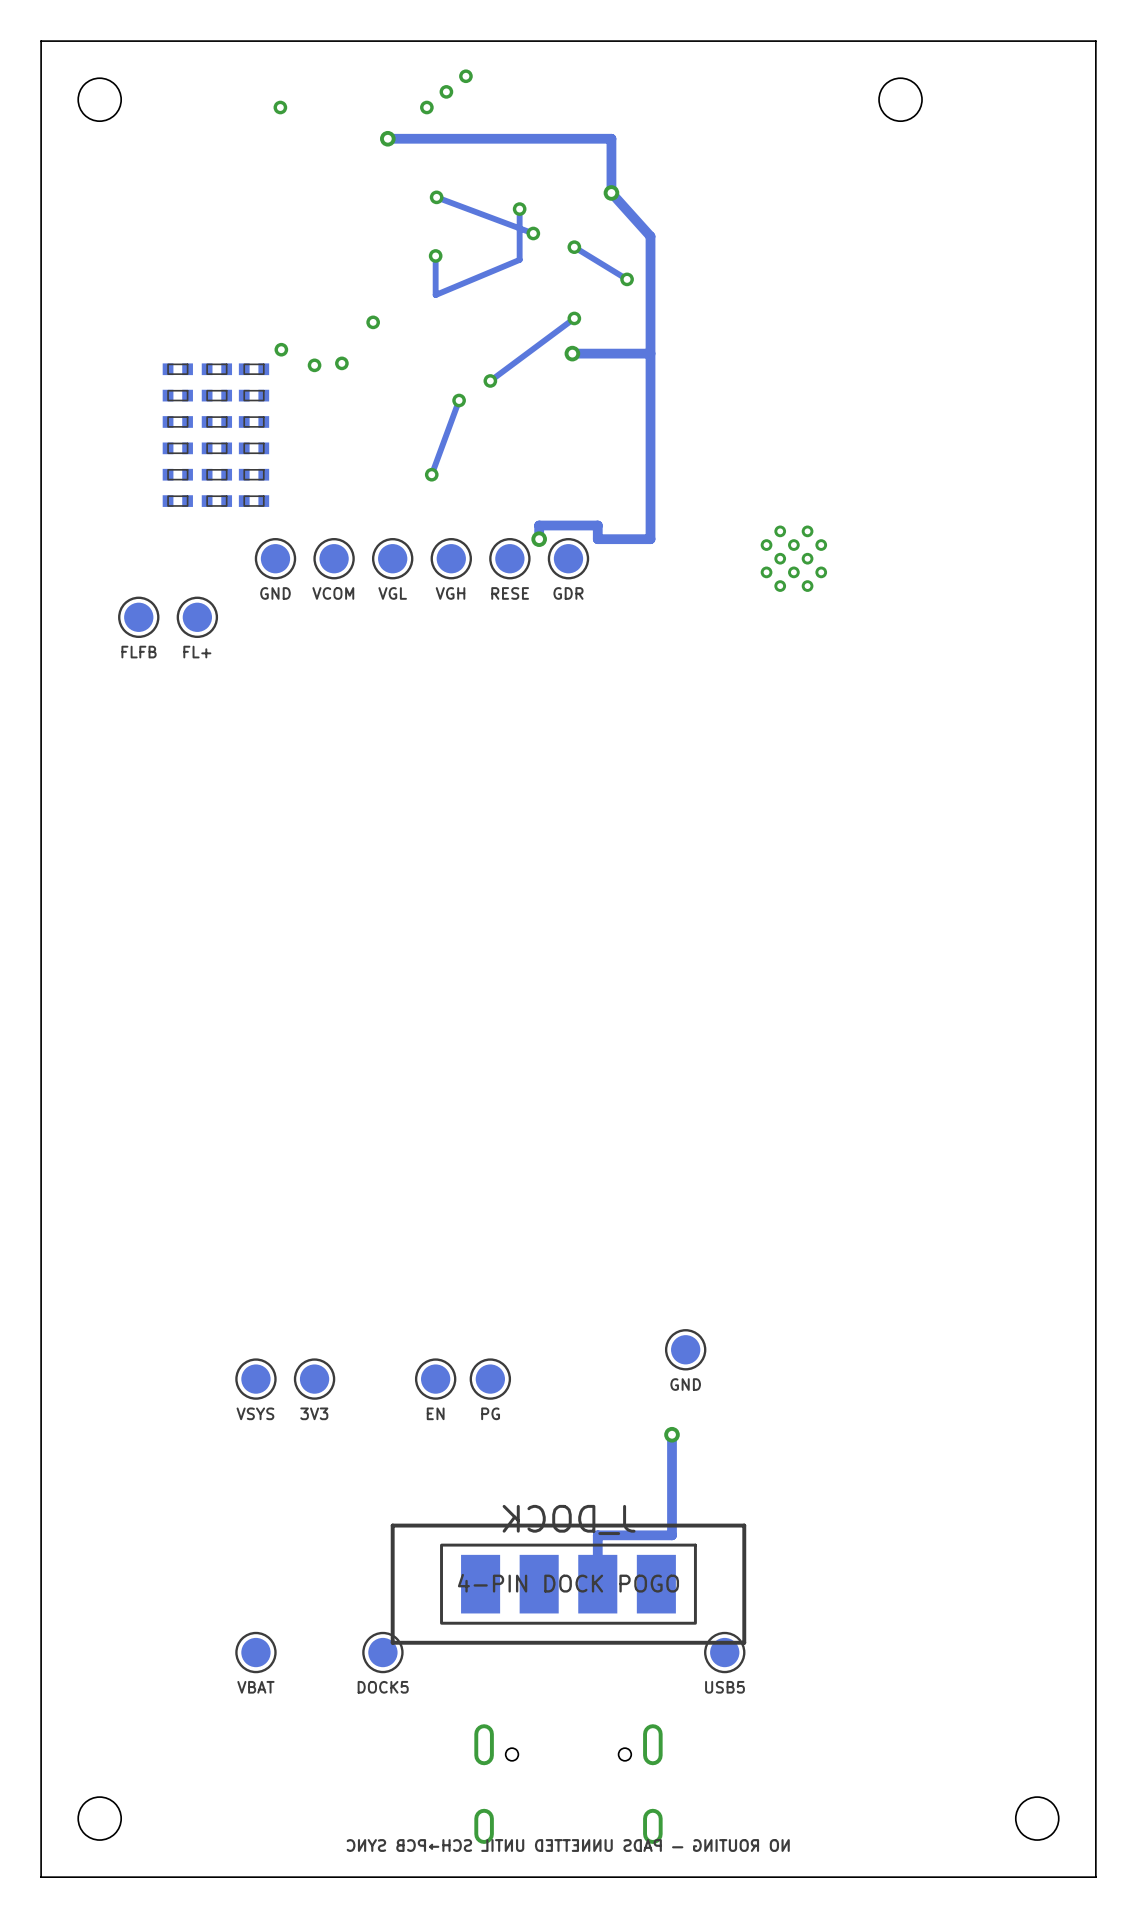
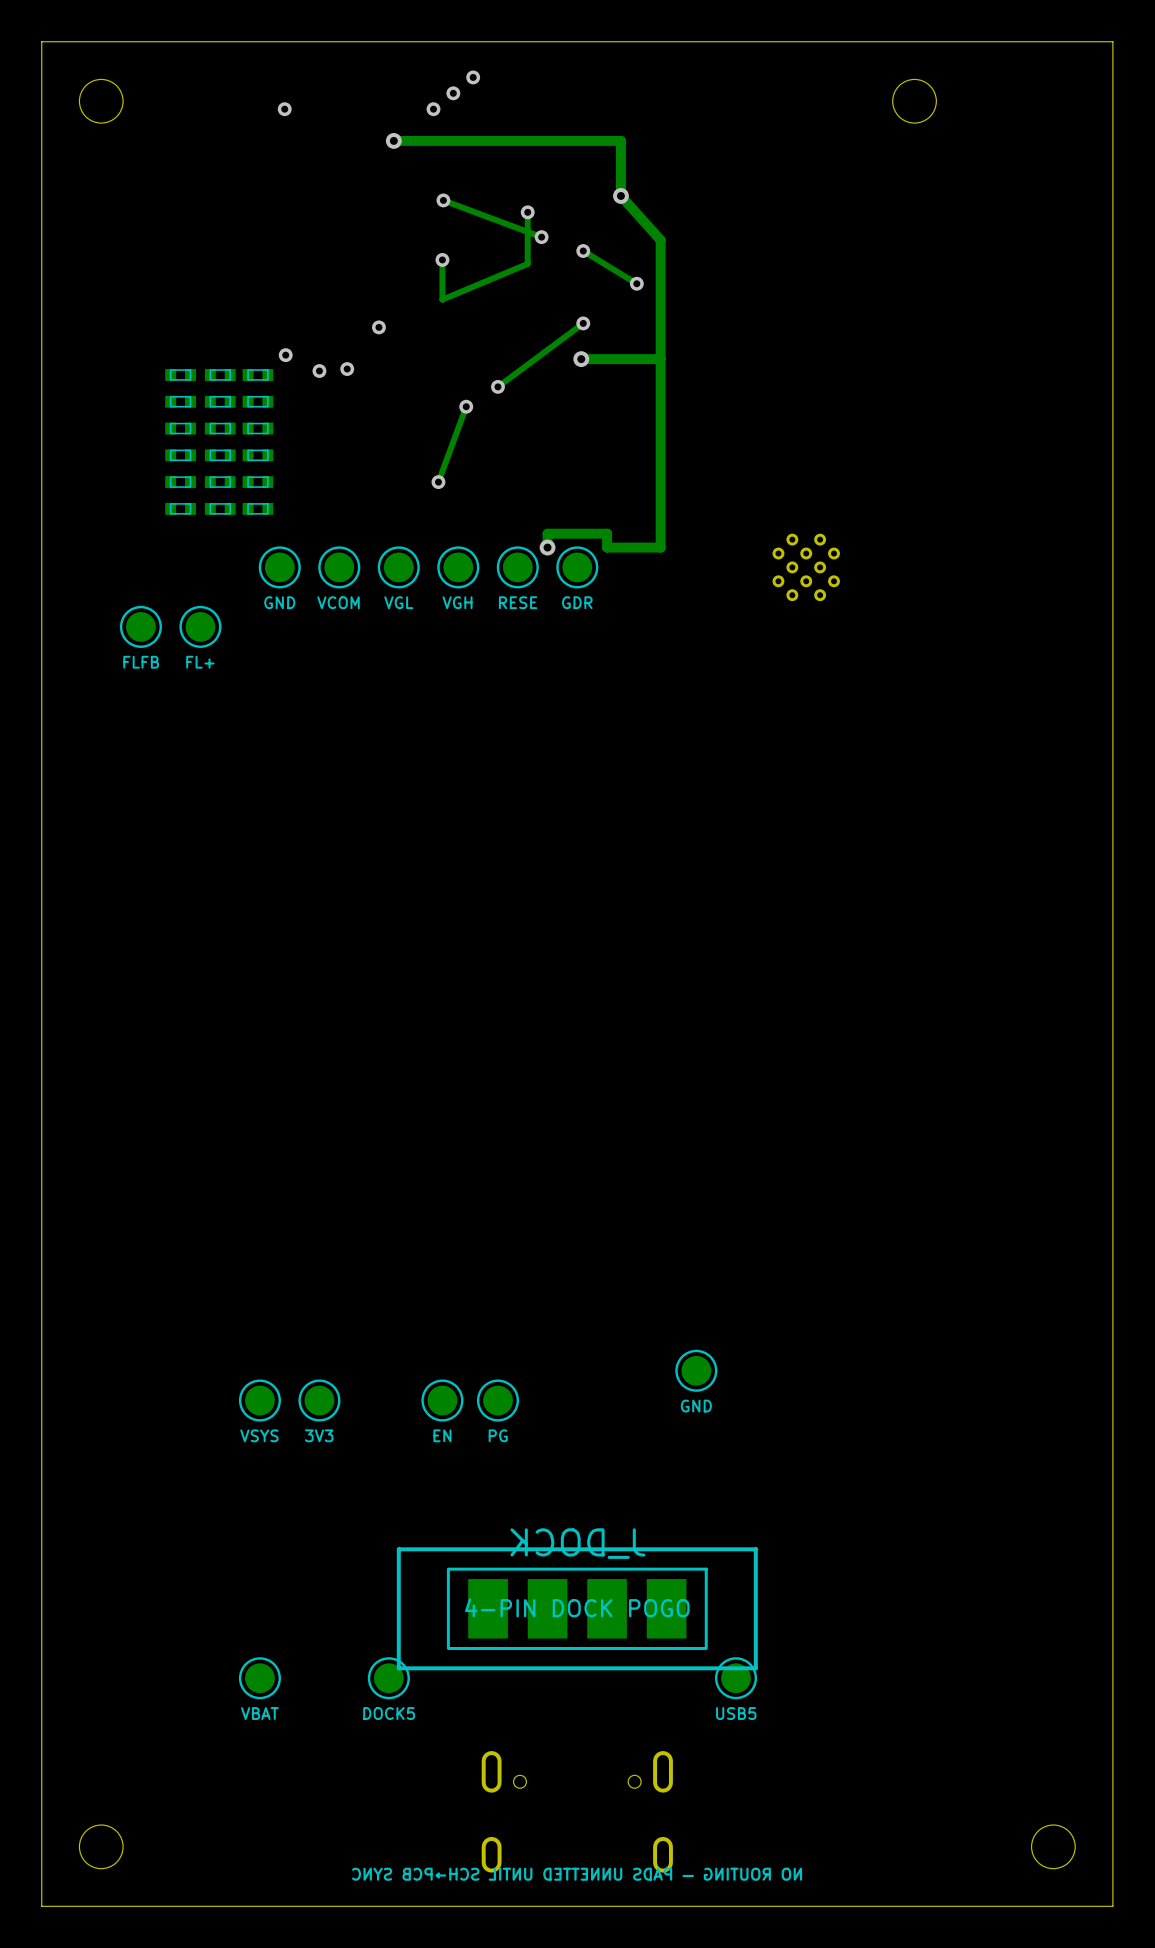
track: (672, 1434) (672, 1535) (597, 1535) (597, 1584) -> none
via: (672, 1434) -> none

